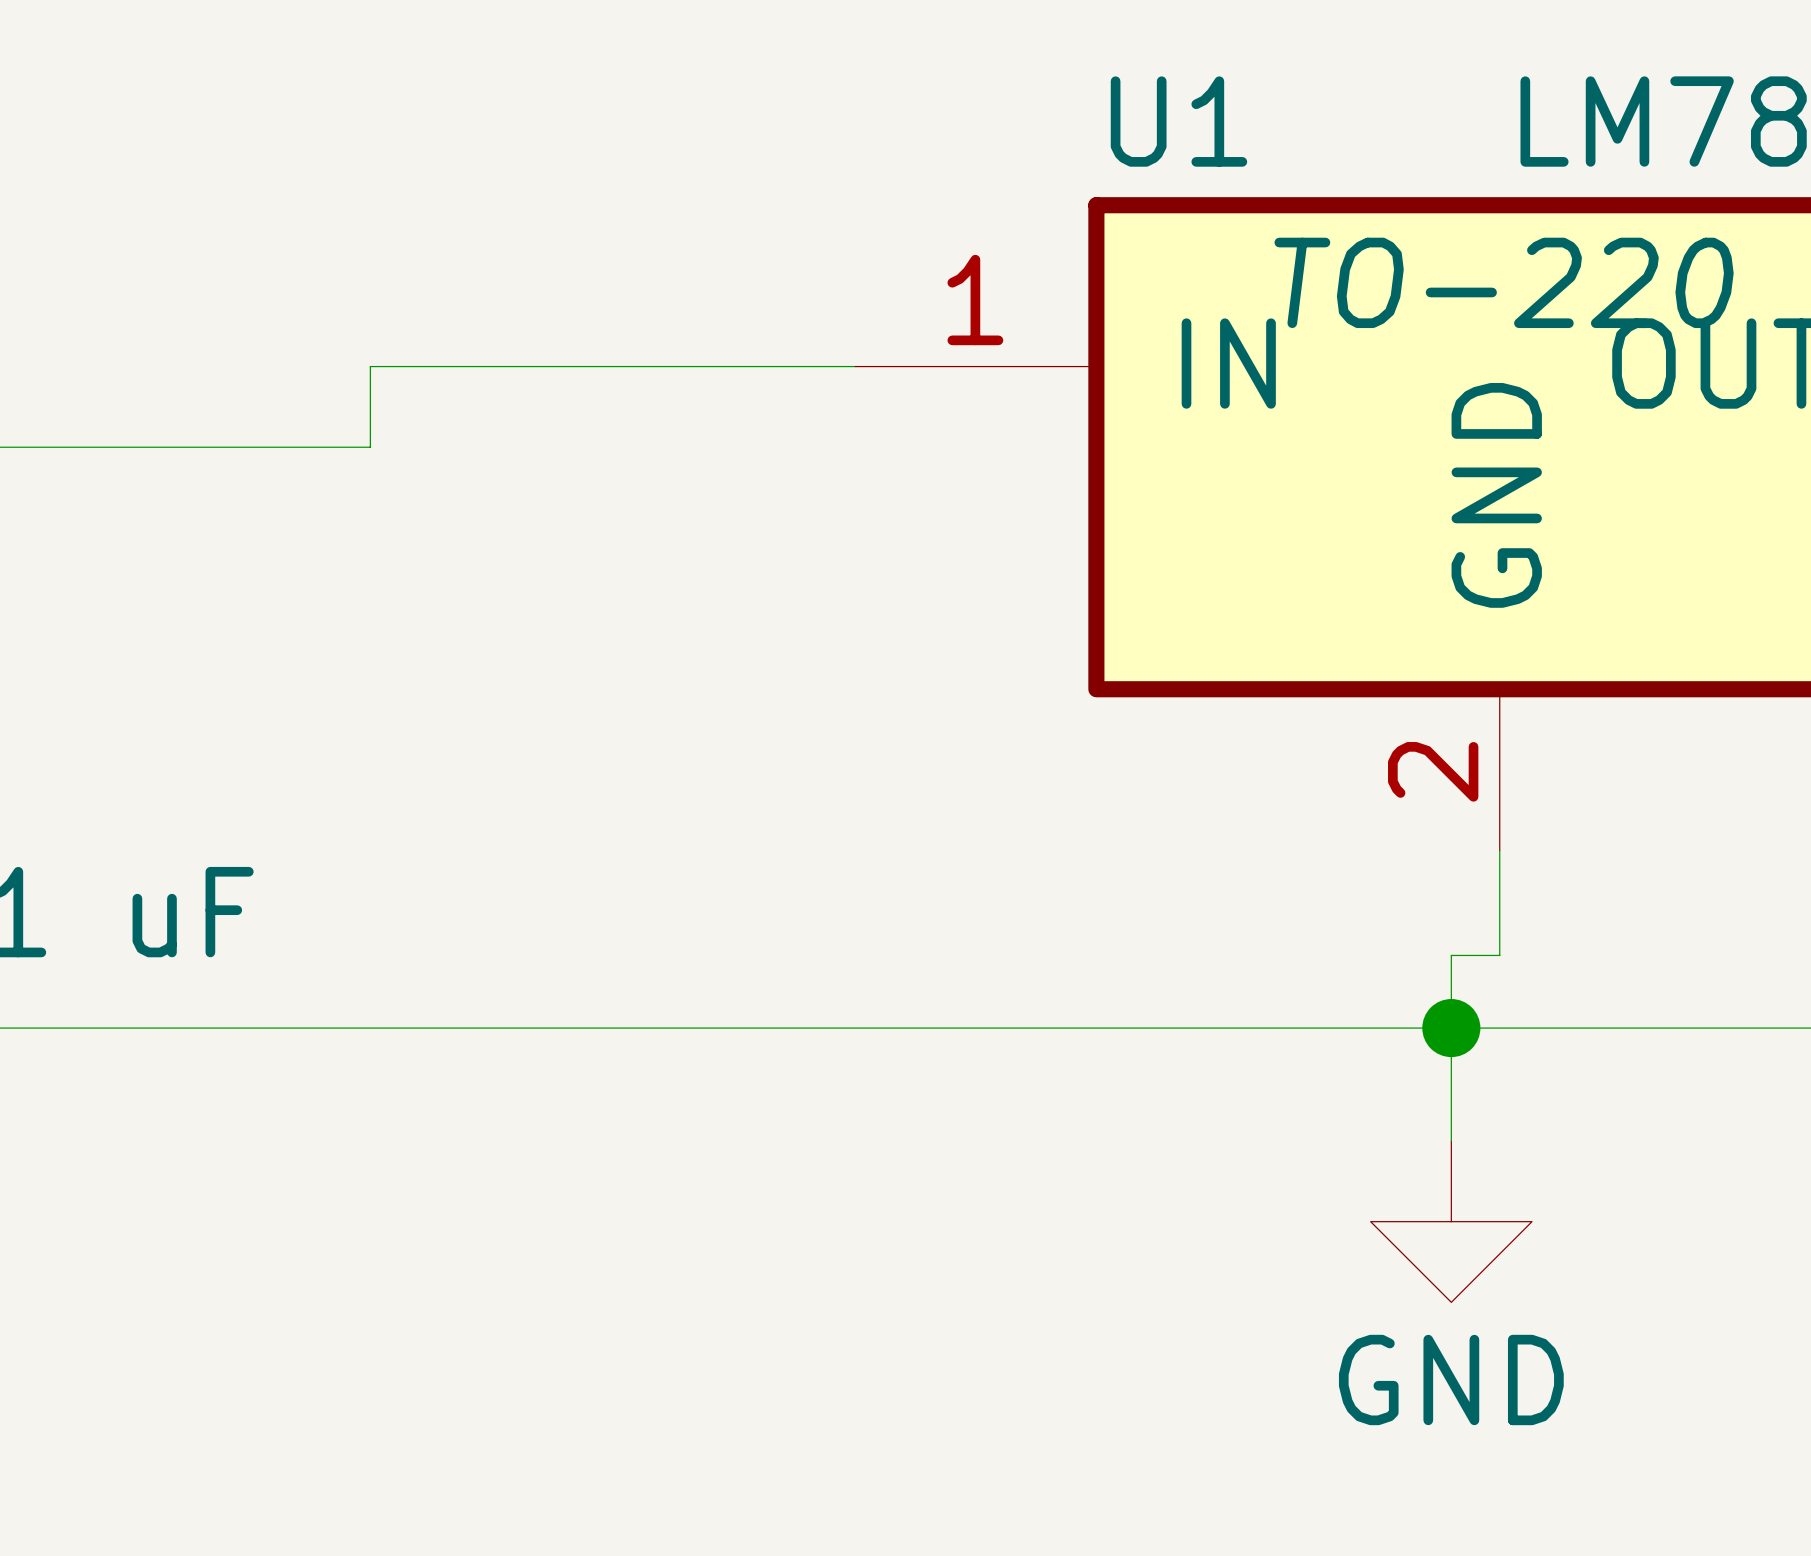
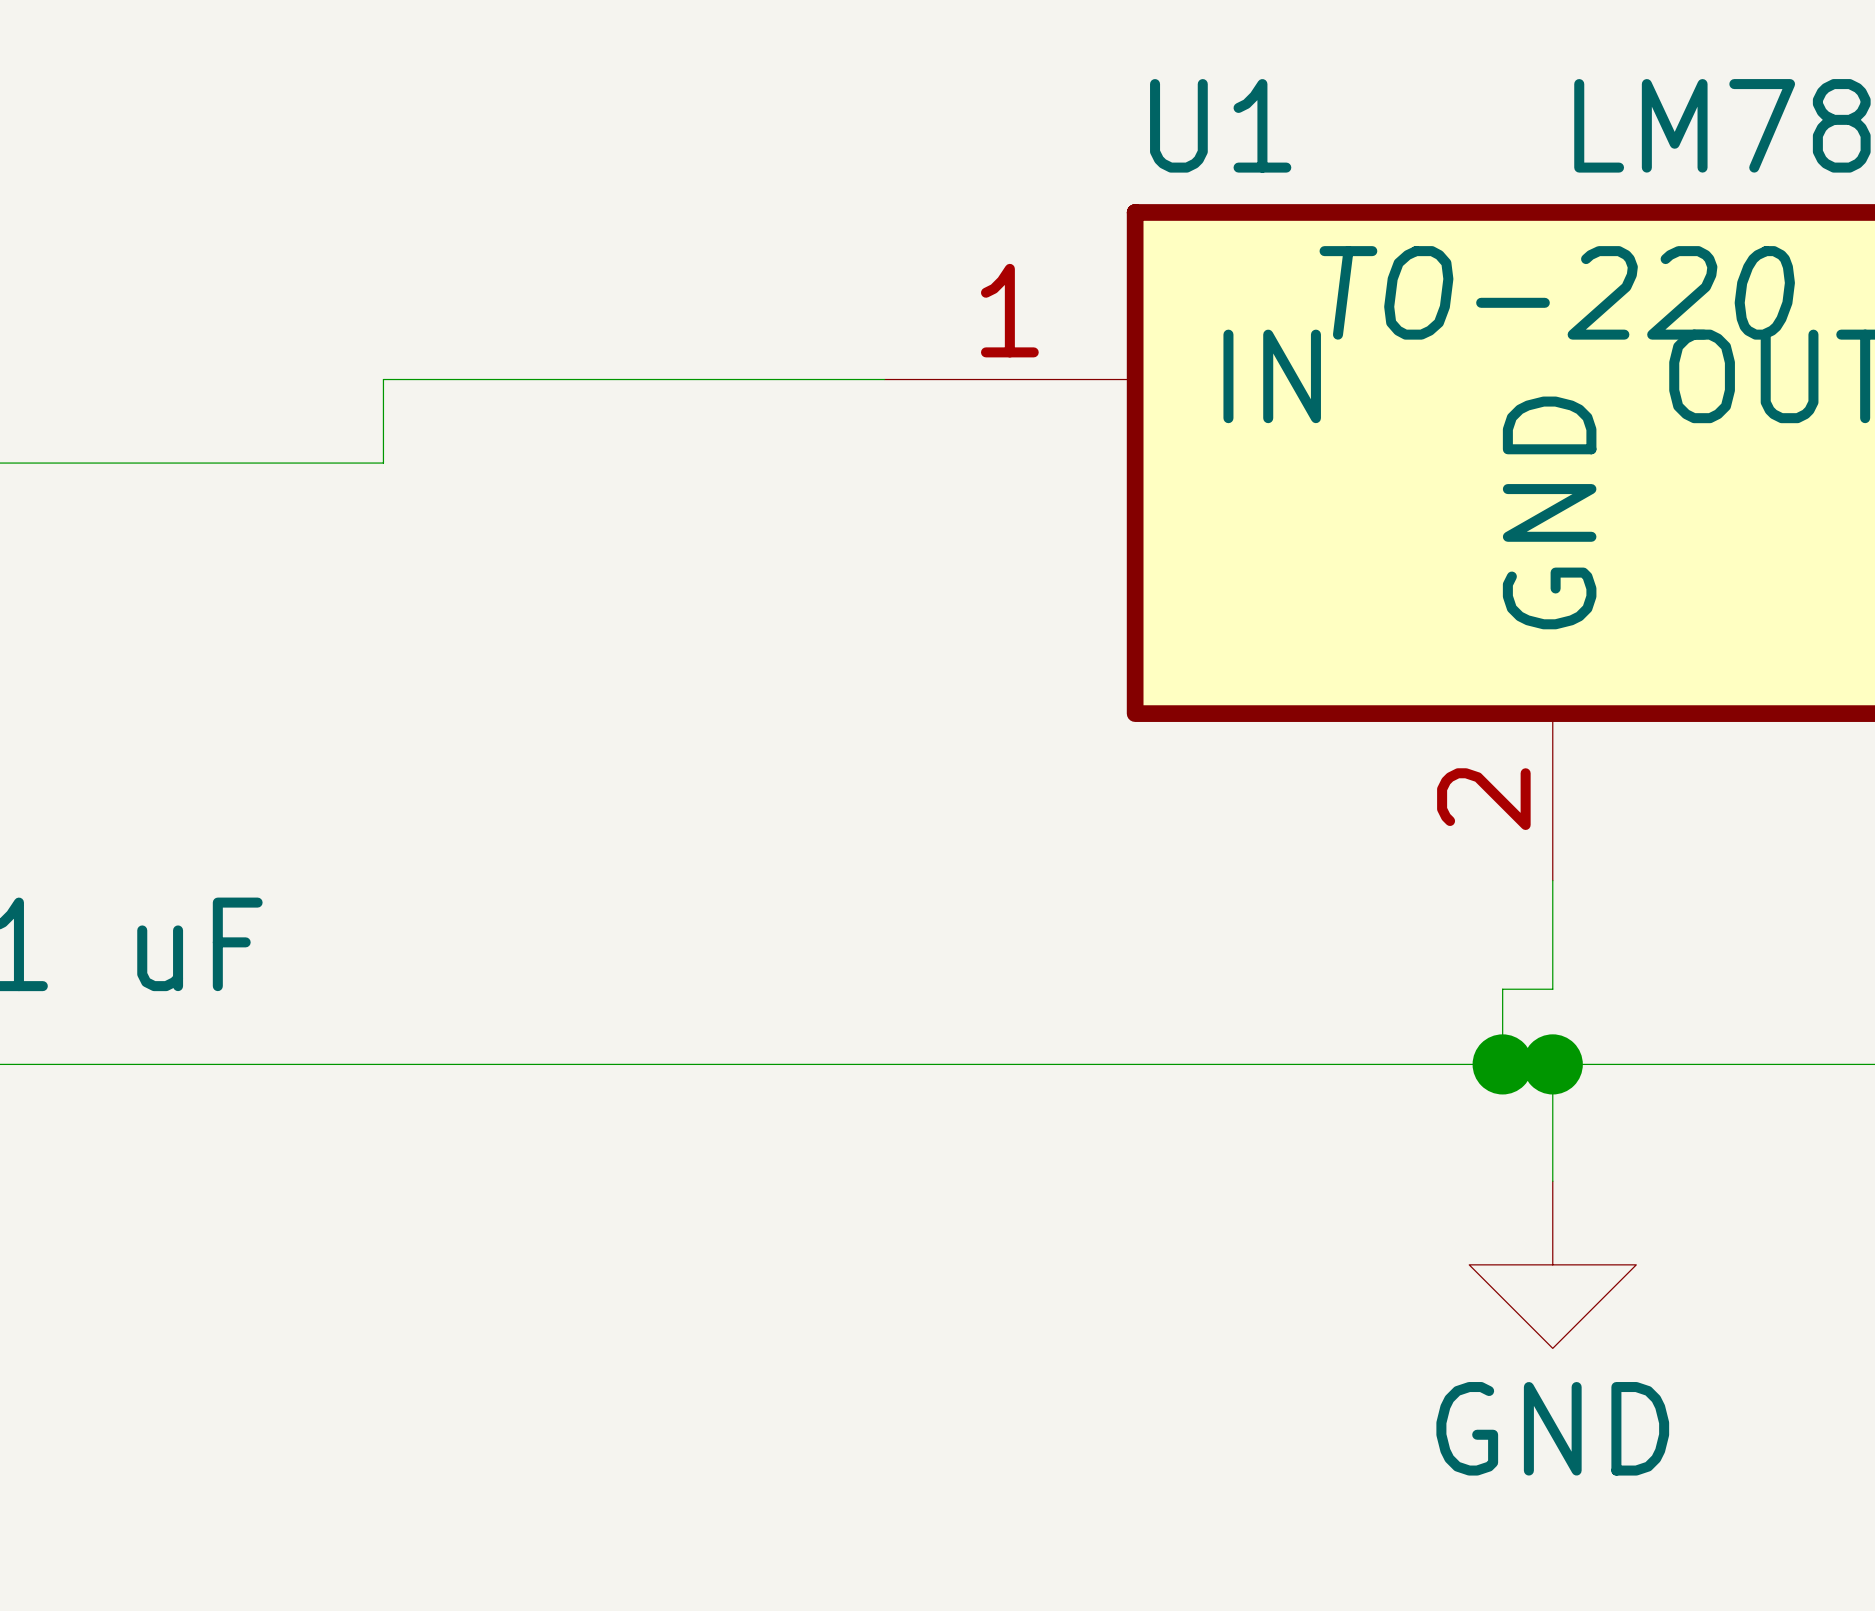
wire: (1451, 1028) (1451, 1141) -> (1552, 1064) (1552, 1181)
junction: none -> (1552, 1064)
power symbol position: GND (1451, 1221) -> GND (1552, 1264)

